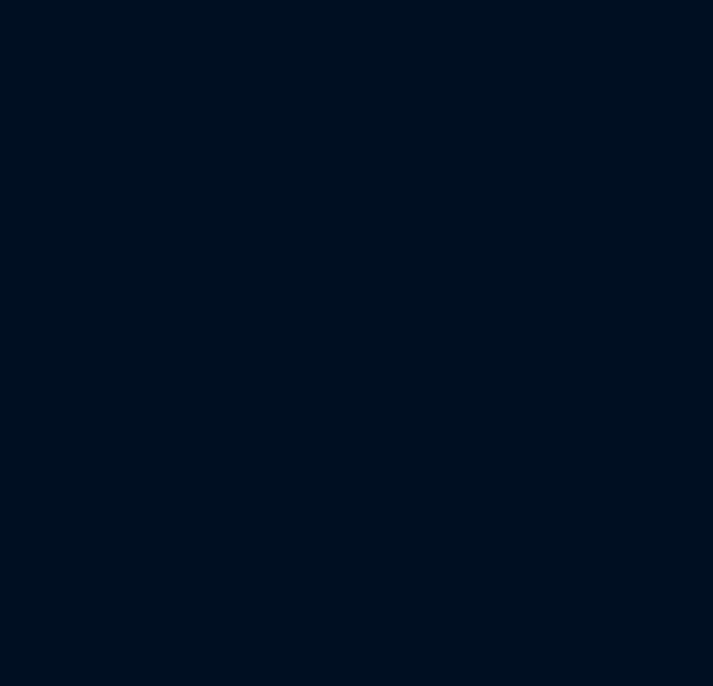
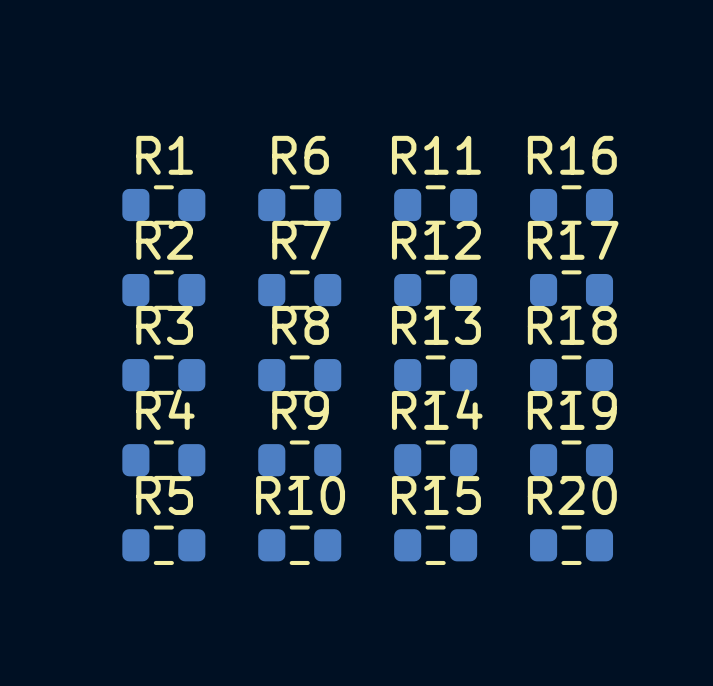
R1: none -> (163, 205)
R6: none -> (299, 205)
R11: none -> (435, 205)
R16: none -> (571, 205)
R2: none -> (163, 290)
R7: none -> (299, 290)
R12: none -> (435, 290)
R17: none -> (571, 290)
R3: none -> (163, 375)
R8: none -> (299, 375)
R13: none -> (435, 375)
R18: none -> (571, 375)
R4: none -> (163, 460)
R9: none -> (299, 460)
R14: none -> (435, 460)
R19: none -> (571, 460)
R5: none -> (163, 545)
R10: none -> (299, 545)
R15: none -> (435, 545)
R20: none -> (571, 545)

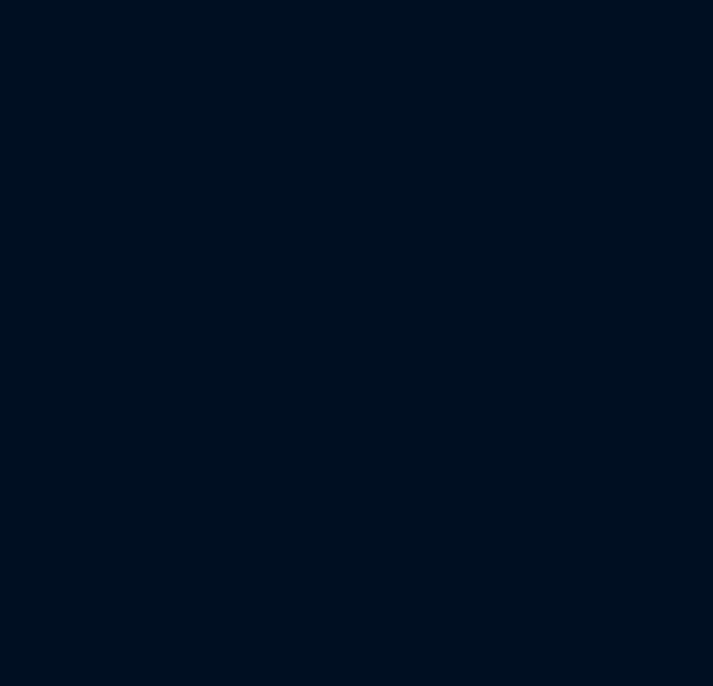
R1: (163, 205) -> none
R6: (299, 205) -> none
R11: (435, 205) -> none
R16: (571, 205) -> none
R2: (163, 290) -> none
R7: (299, 290) -> none
R12: (435, 290) -> none
R17: (571, 290) -> none
R3: (163, 375) -> none
R8: (299, 375) -> none
R13: (435, 375) -> none
R18: (571, 375) -> none
R4: (163, 460) -> none
R9: (299, 460) -> none
R14: (435, 460) -> none
R19: (571, 460) -> none
R5: (163, 545) -> none
R10: (299, 545) -> none
R15: (435, 545) -> none
R20: (571, 545) -> none

